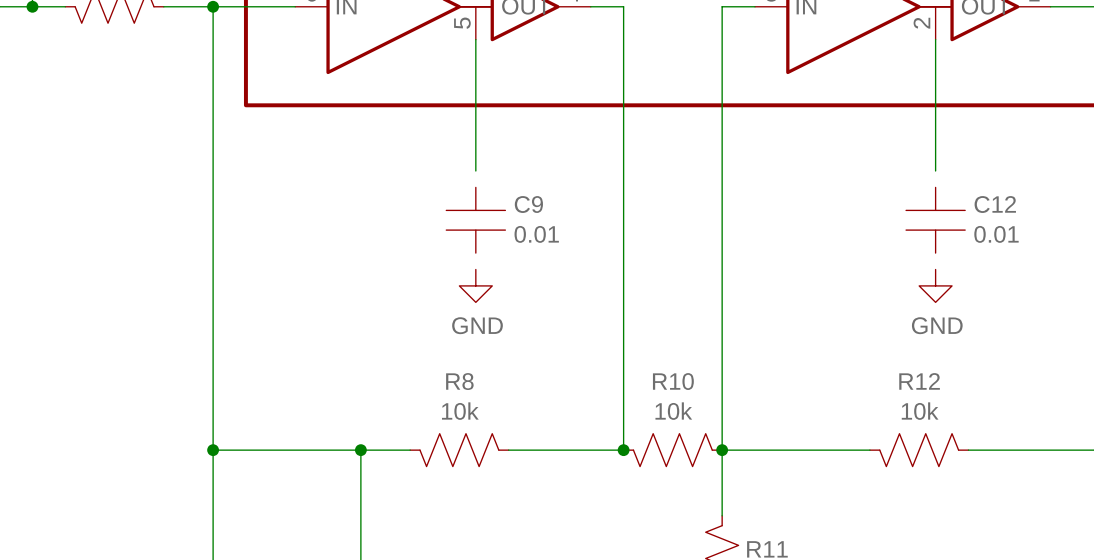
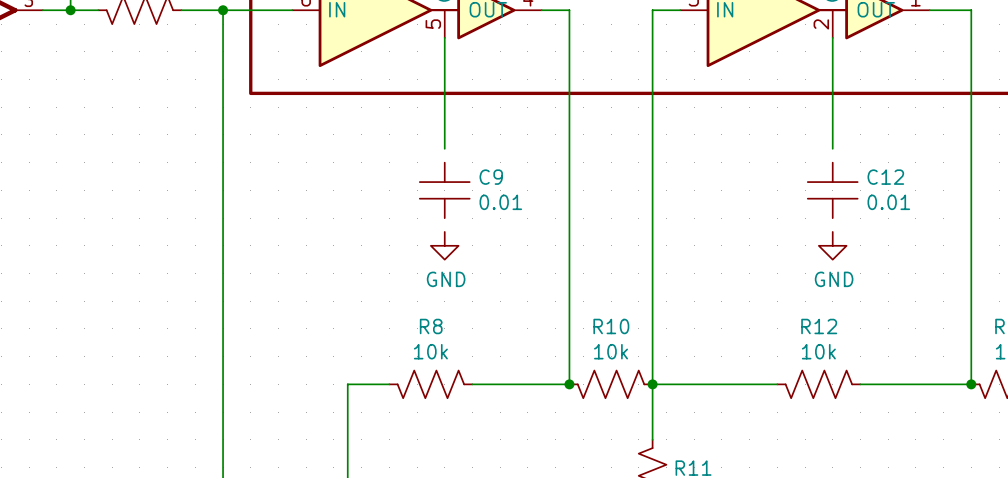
wire: (213, 450) (360, 450) -> none
junction: (213, 450) -> none
junction: (360, 450) -> none

